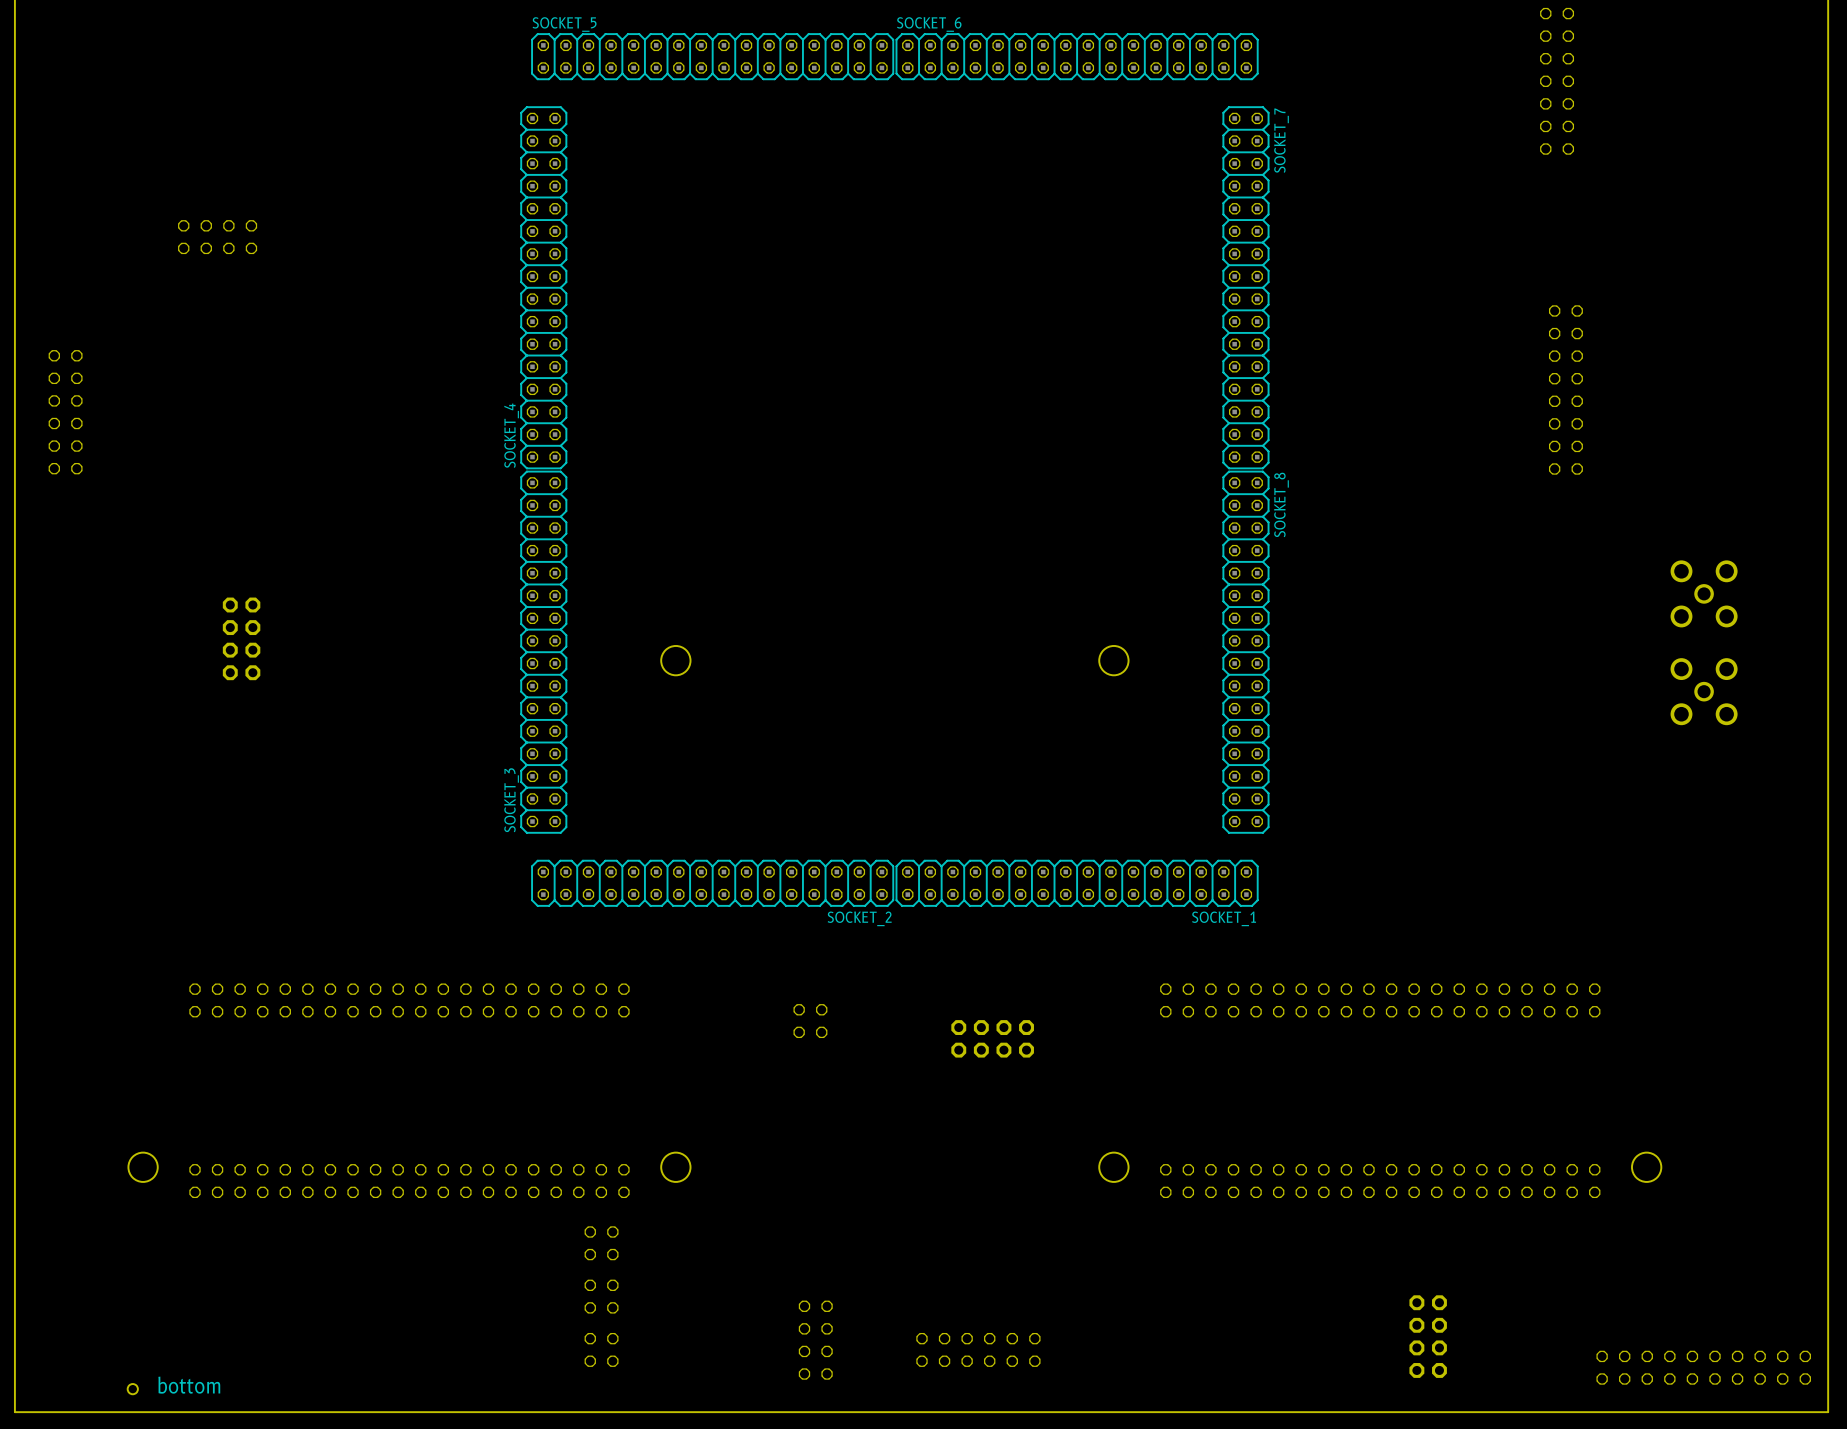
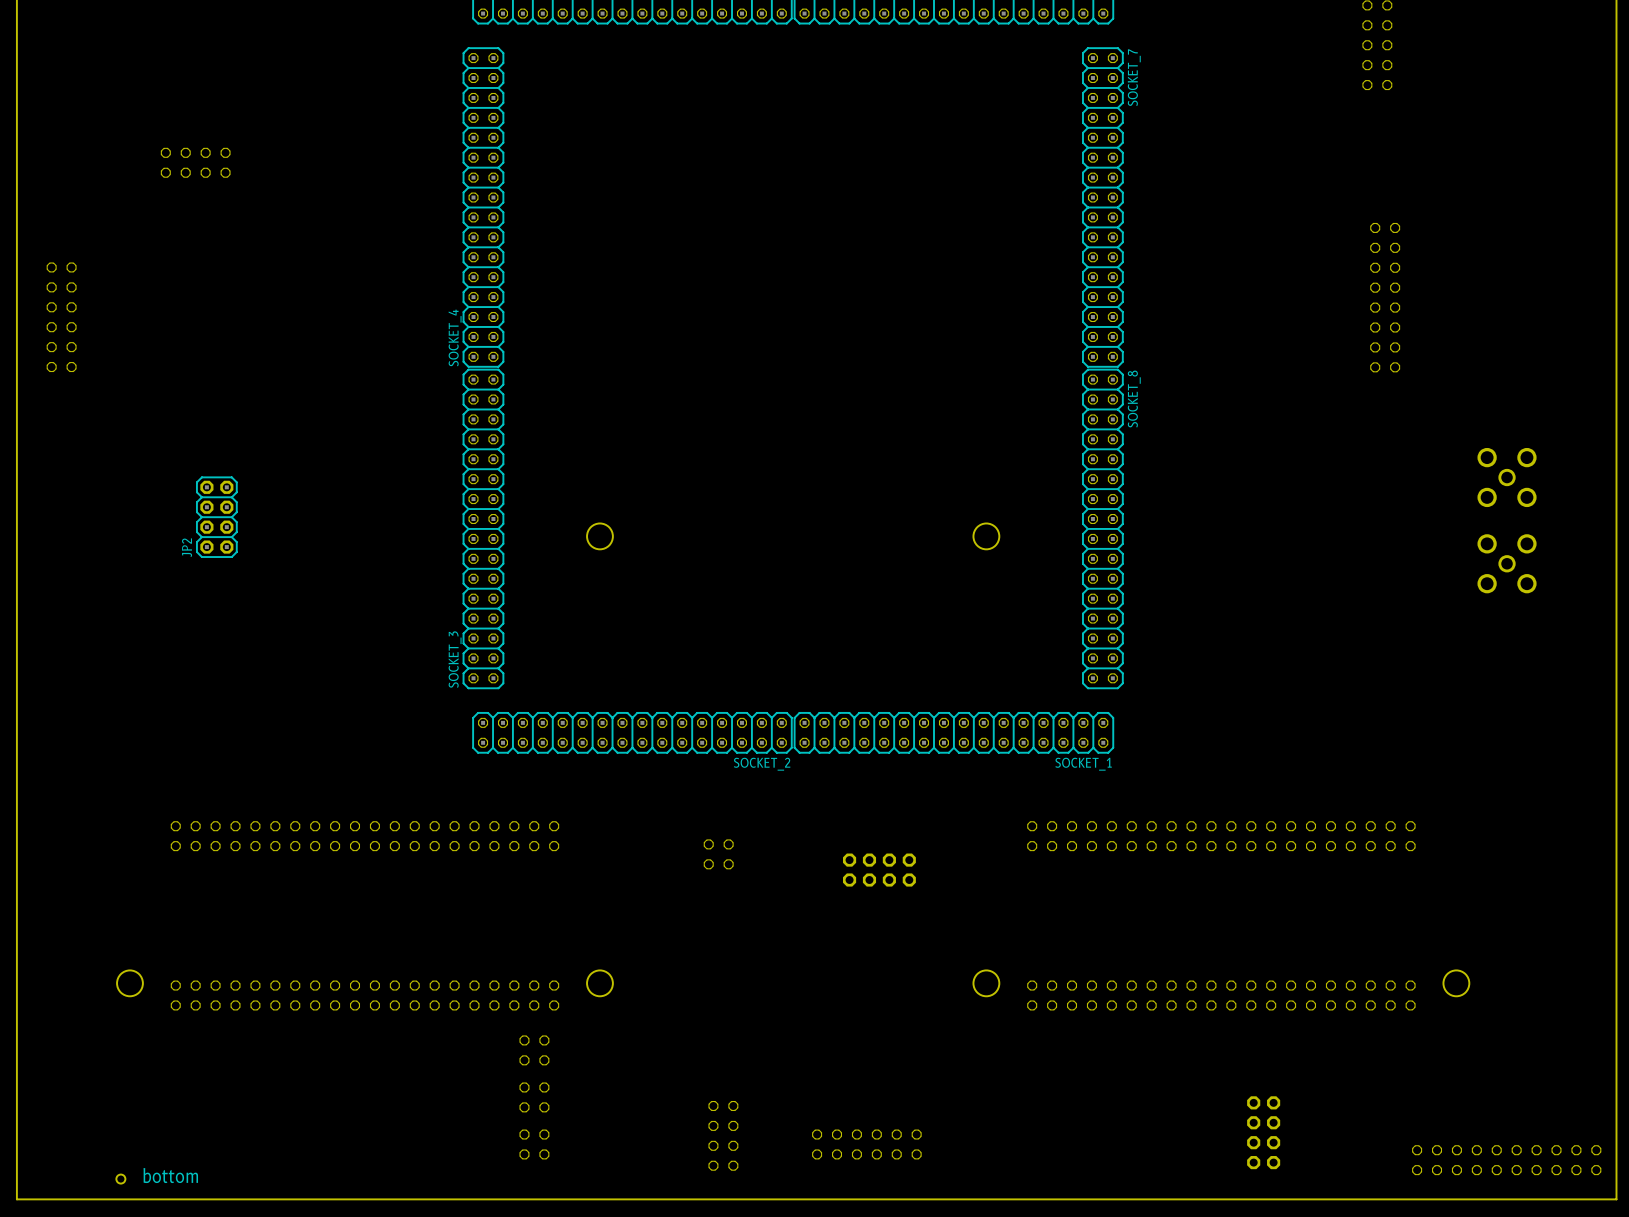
JP2 side: top (241, 638) -> bottom (216, 517)

